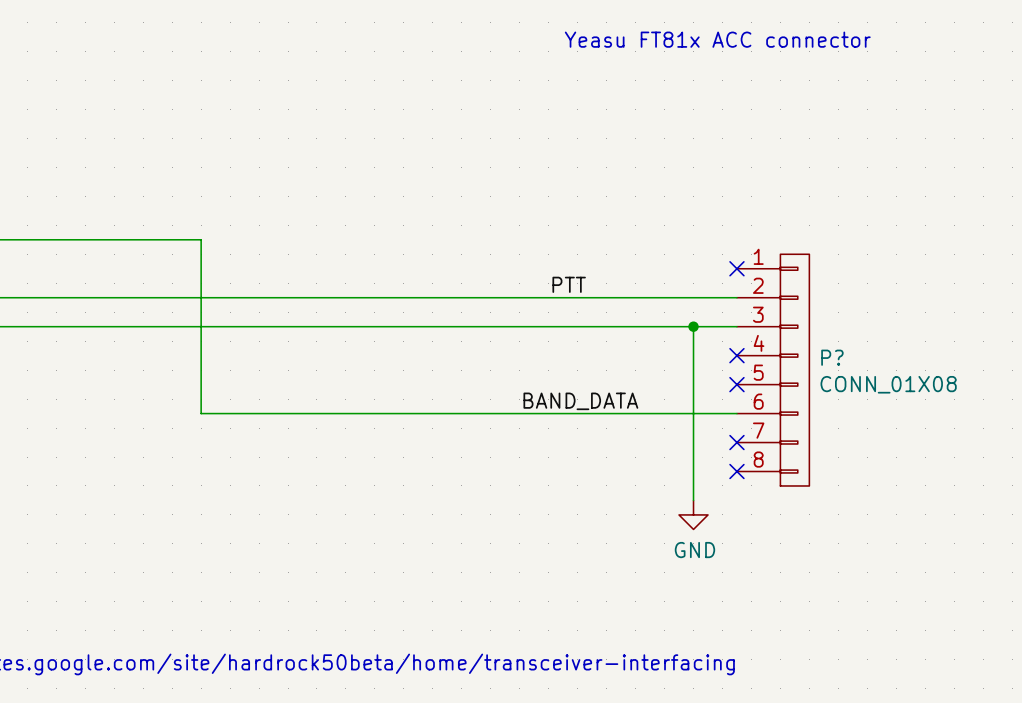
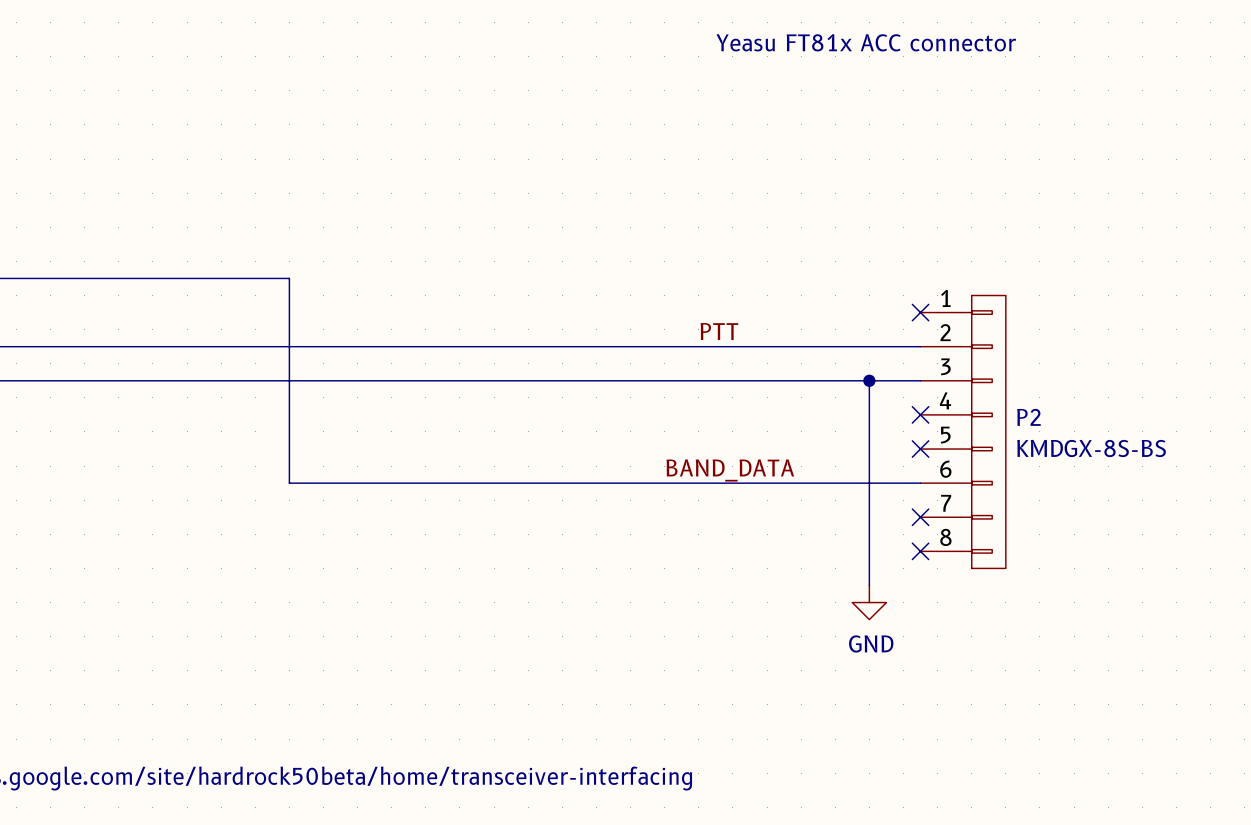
P? name: P? (832, 357) -> P2 (1028, 417)
P? value: CONN_01X08 (888, 384) -> KMDGX-8S-BS (1091, 448)

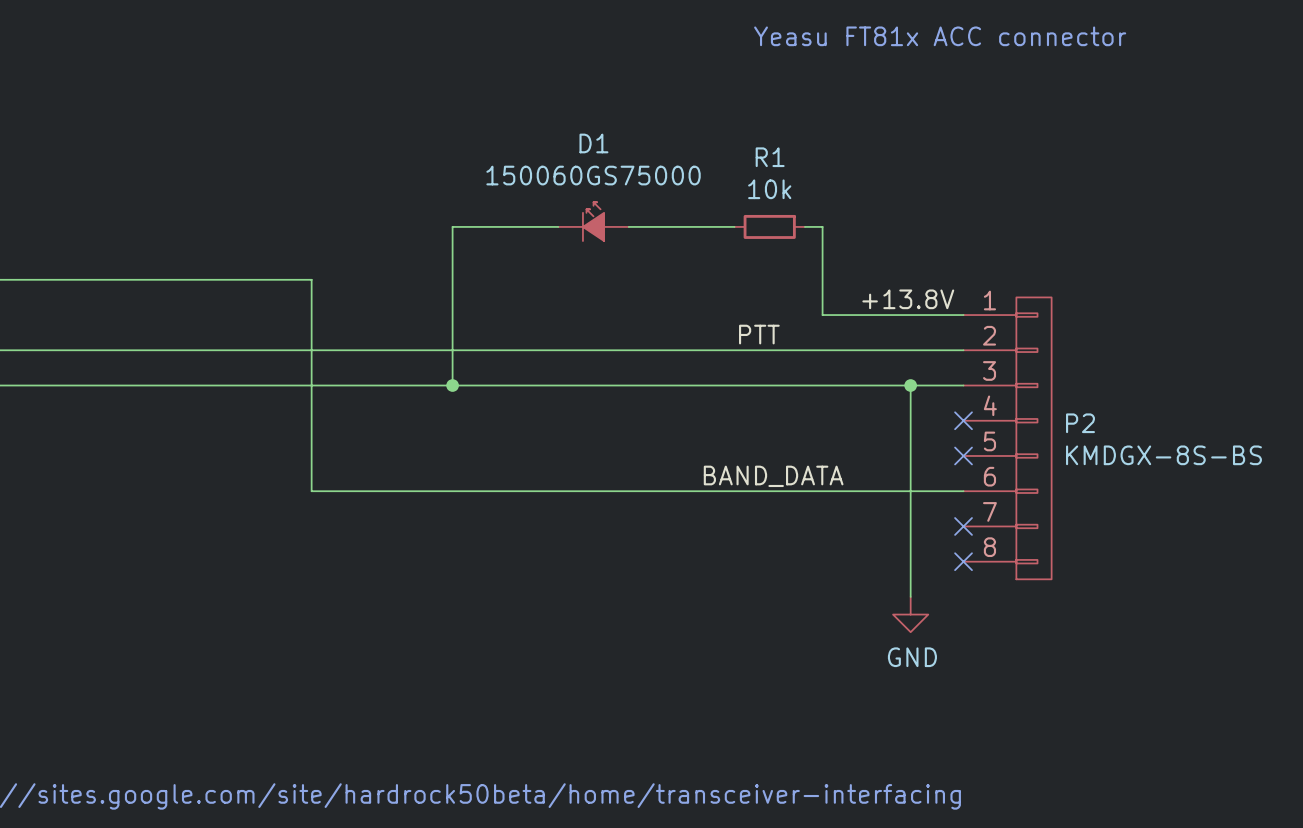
D1: none -> 150060GS75000 (593, 221)
wire: none -> (558, 226) (452, 226) (452, 385)
wire: none -> (628, 226) (734, 226)
R1: none -> 10k (769, 226)
wire: none -> (804, 226) (822, 226) (822, 315) (963, 315)
label: none -> +13.8V (908, 299)
no-connect mark: (920, 312) -> none
junction: none -> (452, 385)

